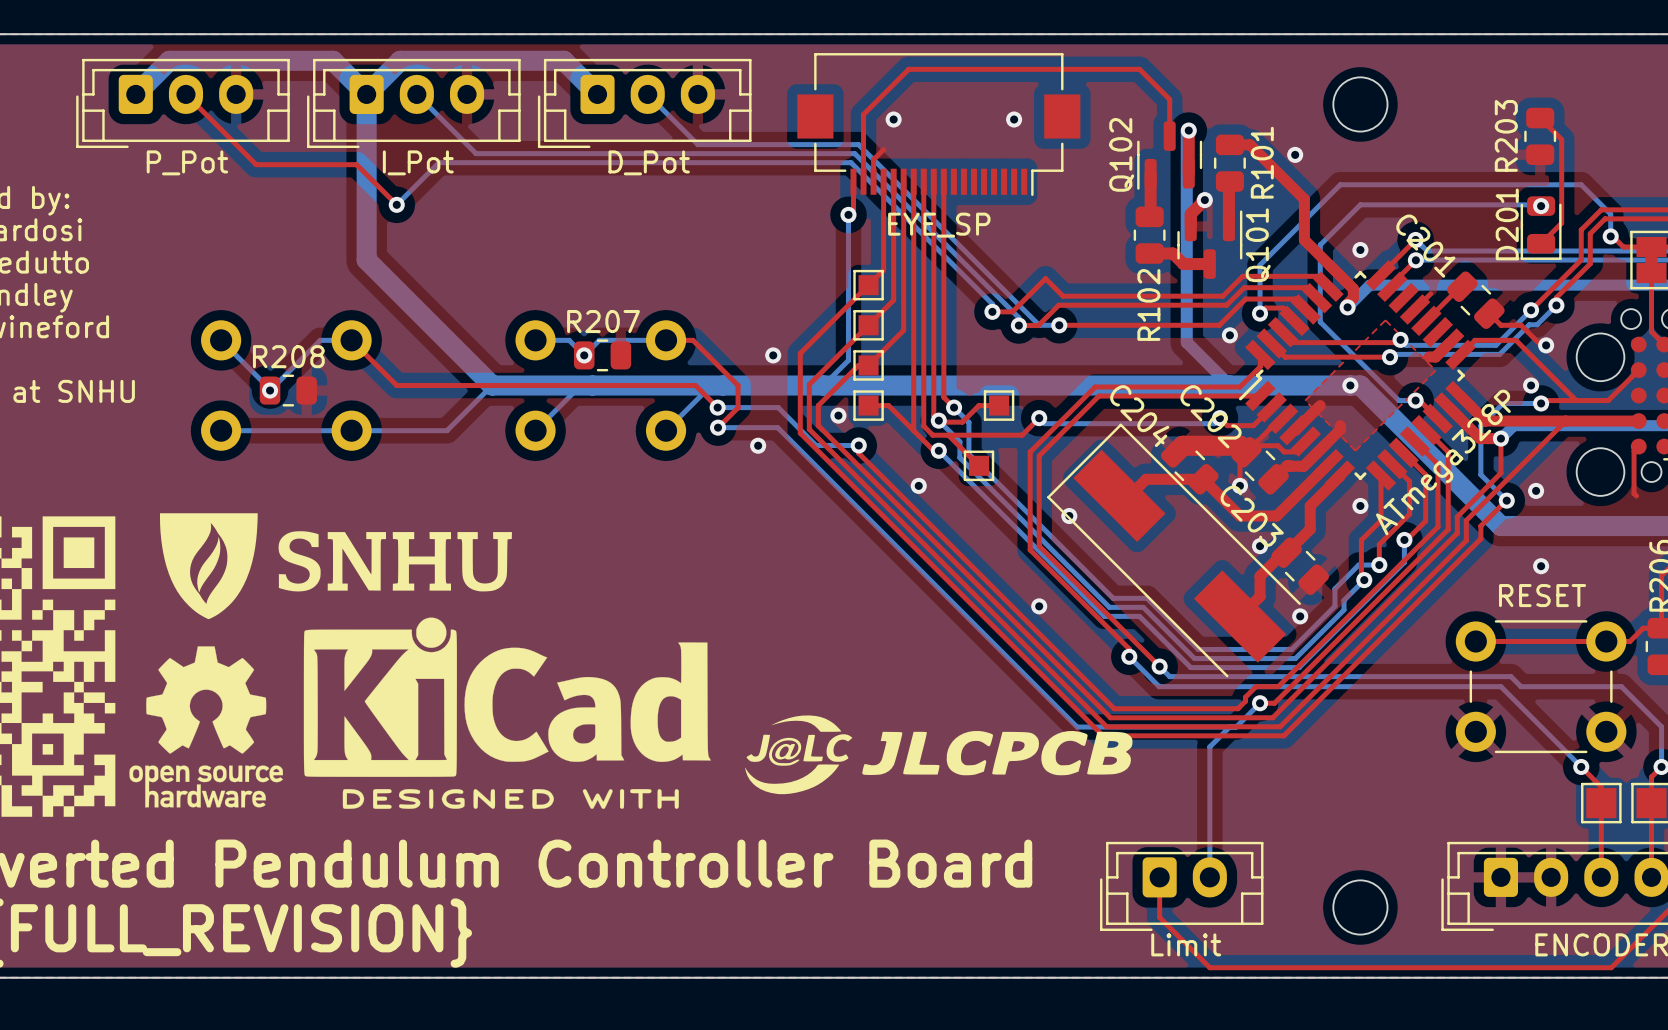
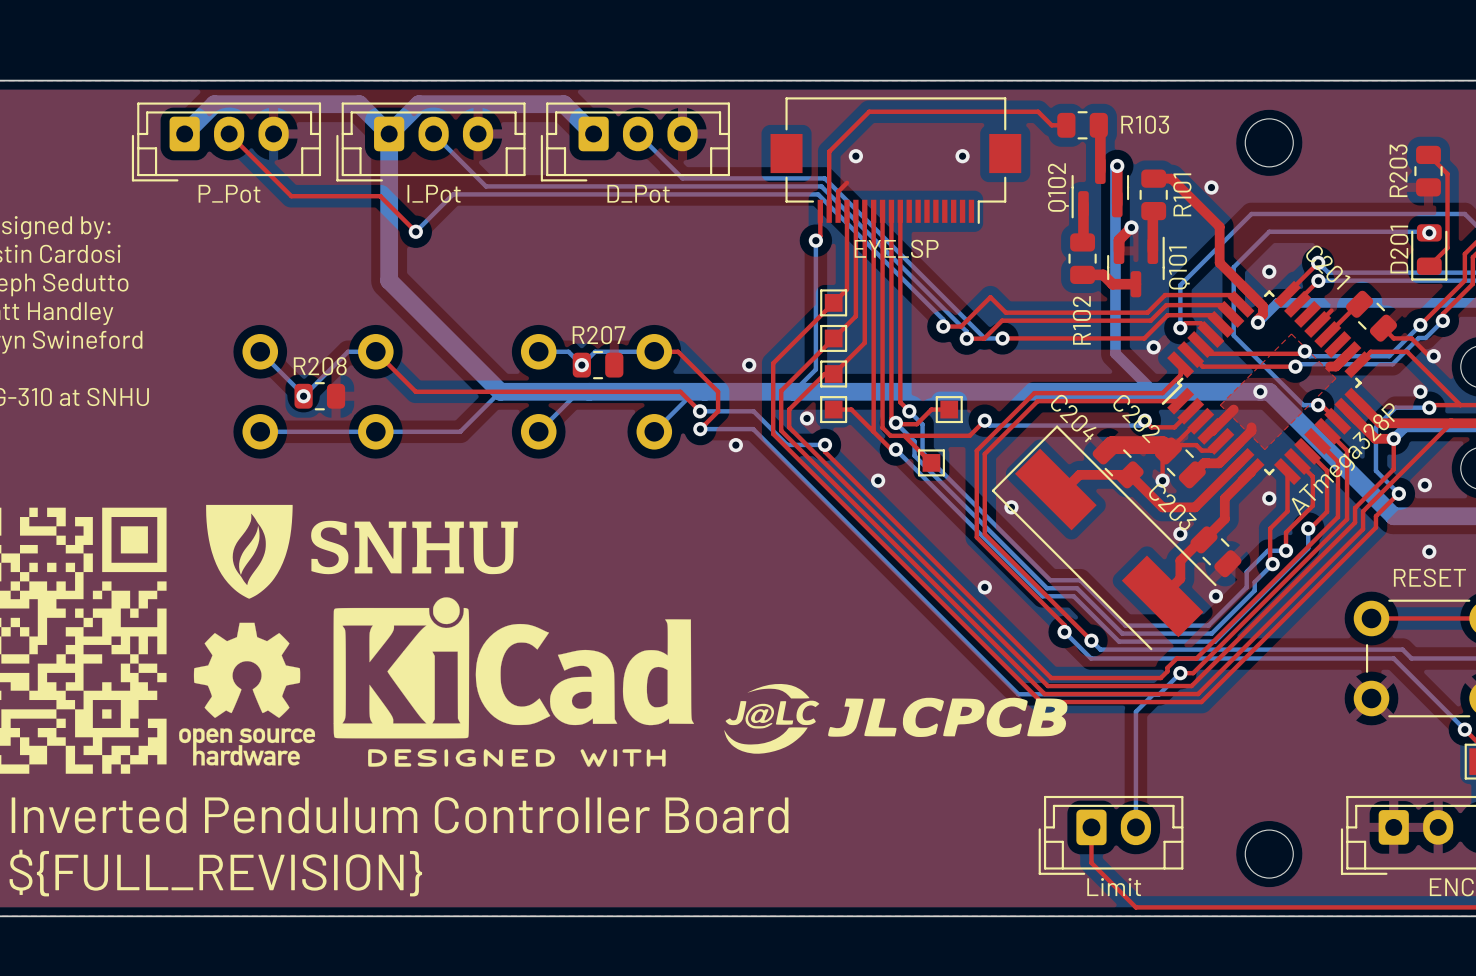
top track: (1099, 69) (1139, 69) (1169, 99) -> (1038, 111) (1051, 125) (1066, 125)
R103: none -> (1082, 125)
top track width: thin (1169, 99) (1169, 136) -> thick (1100, 138) (1100, 170)

